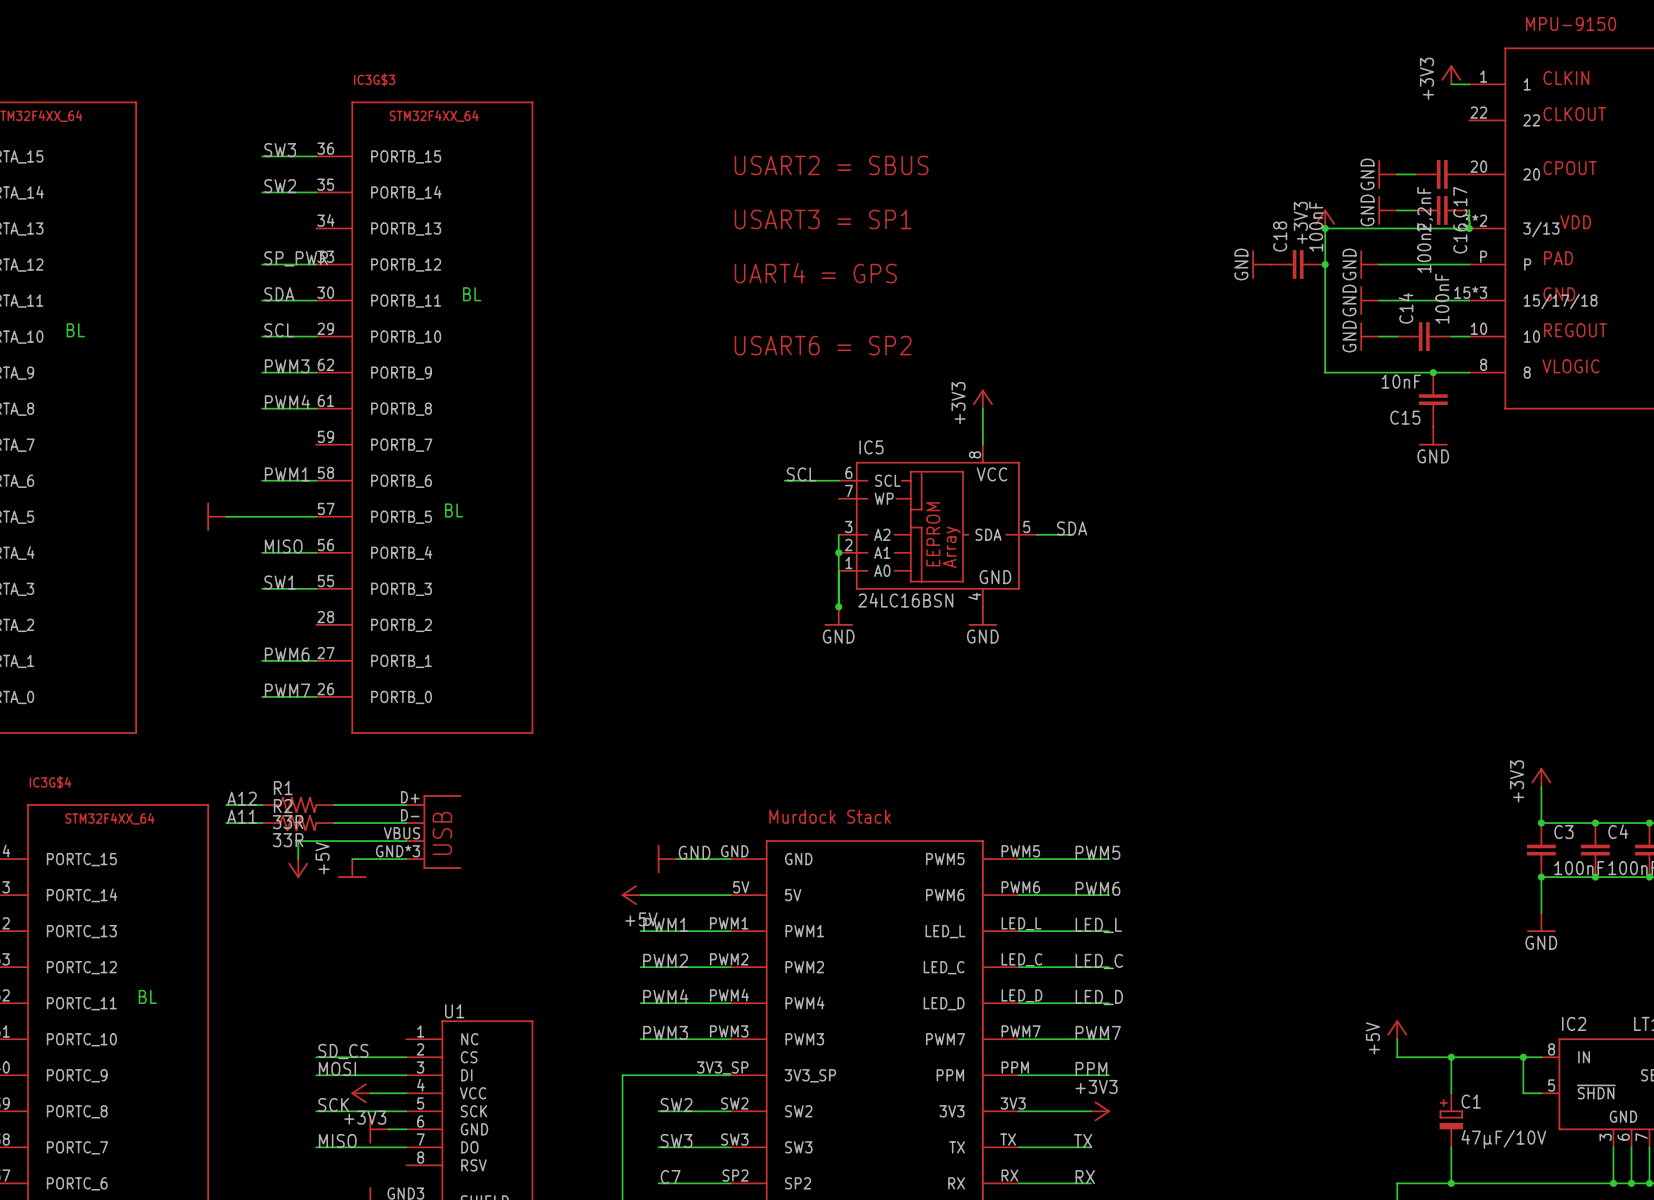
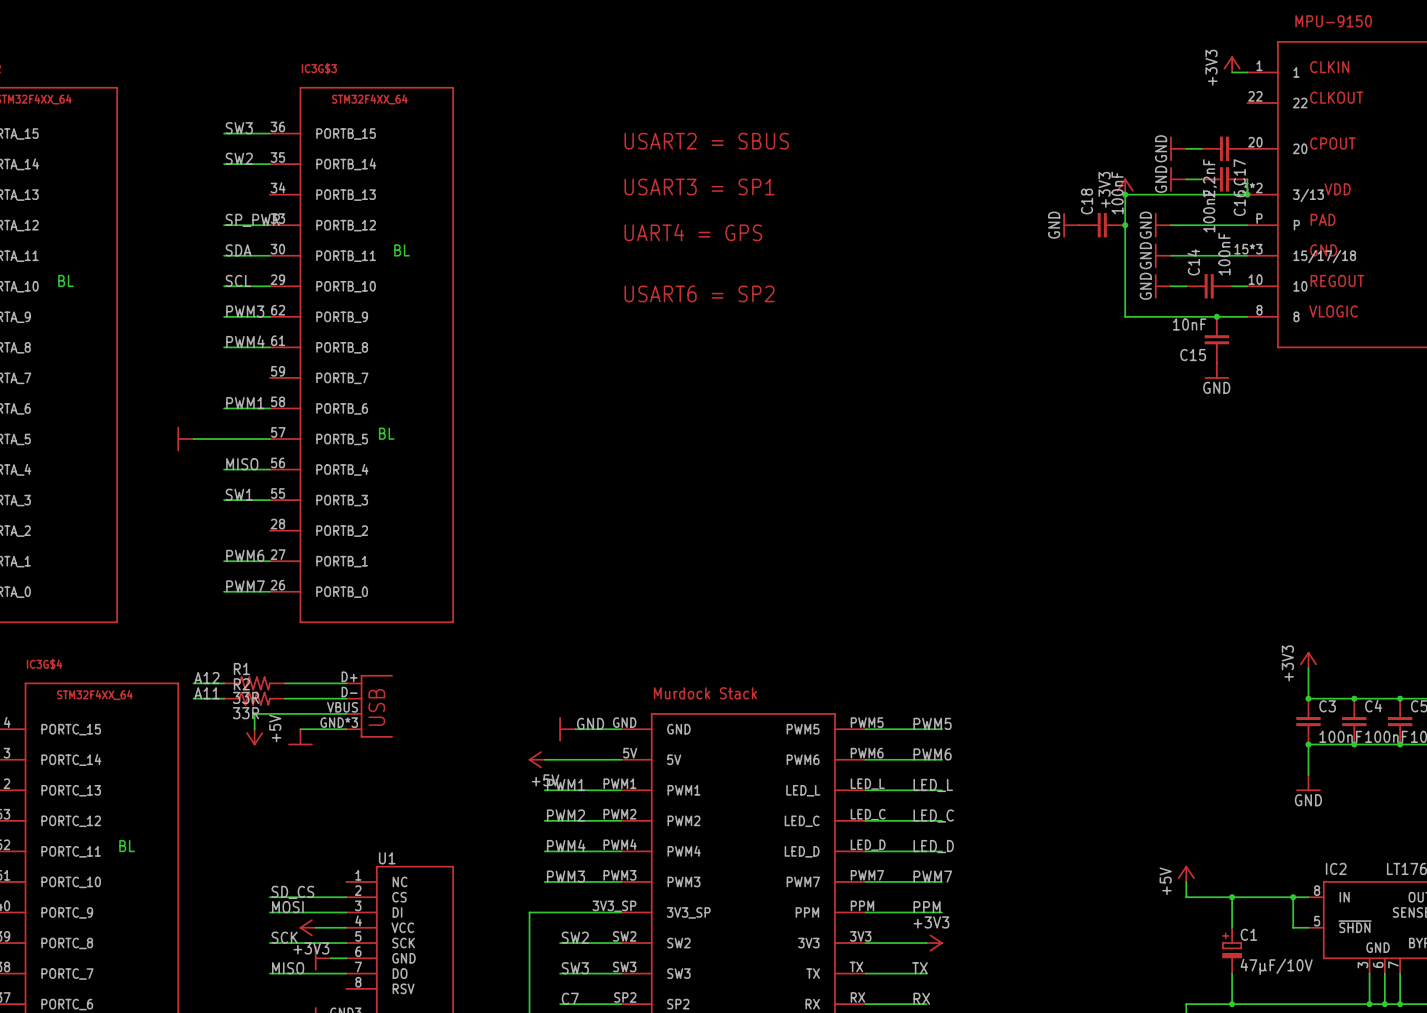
power symbol: +3V3 (982, 399) -> none
wire: (982, 408) (982, 444) -> none
label: SCL (801, 474) -> none
wire: (784, 480) (838, 480) -> none
IC5: 24LC16BSN (937, 525) -> none
label: SDA (1072, 528) -> none
wire: (838, 534) (838, 606) -> none
wire: (1036, 534) (1072, 534) -> none
junction: (838, 552) -> none
junction: (838, 606) -> none
power symbol: GND (838, 616) -> none
power symbol: GND (982, 616) -> none

